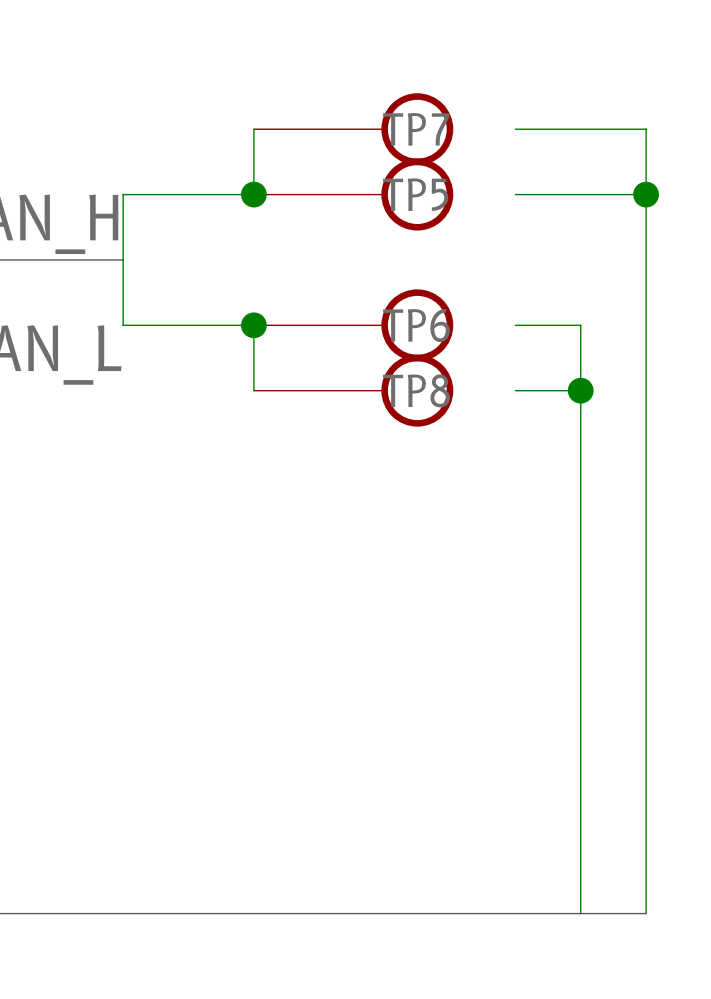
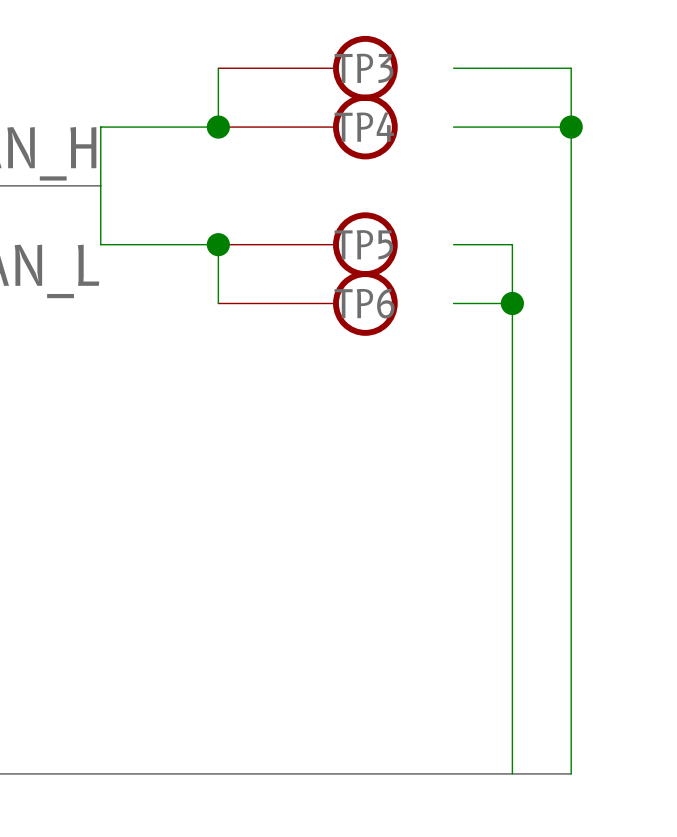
TP7 name: TP7 (416, 129) -> TP3 (363, 68)
TP5 name: TP5 (415, 194) -> TP4 (364, 127)
TP6 name: TP6 (416, 325) -> TP5 (363, 244)
TP8 name: TP8 (416, 390) -> TP6 (364, 303)

